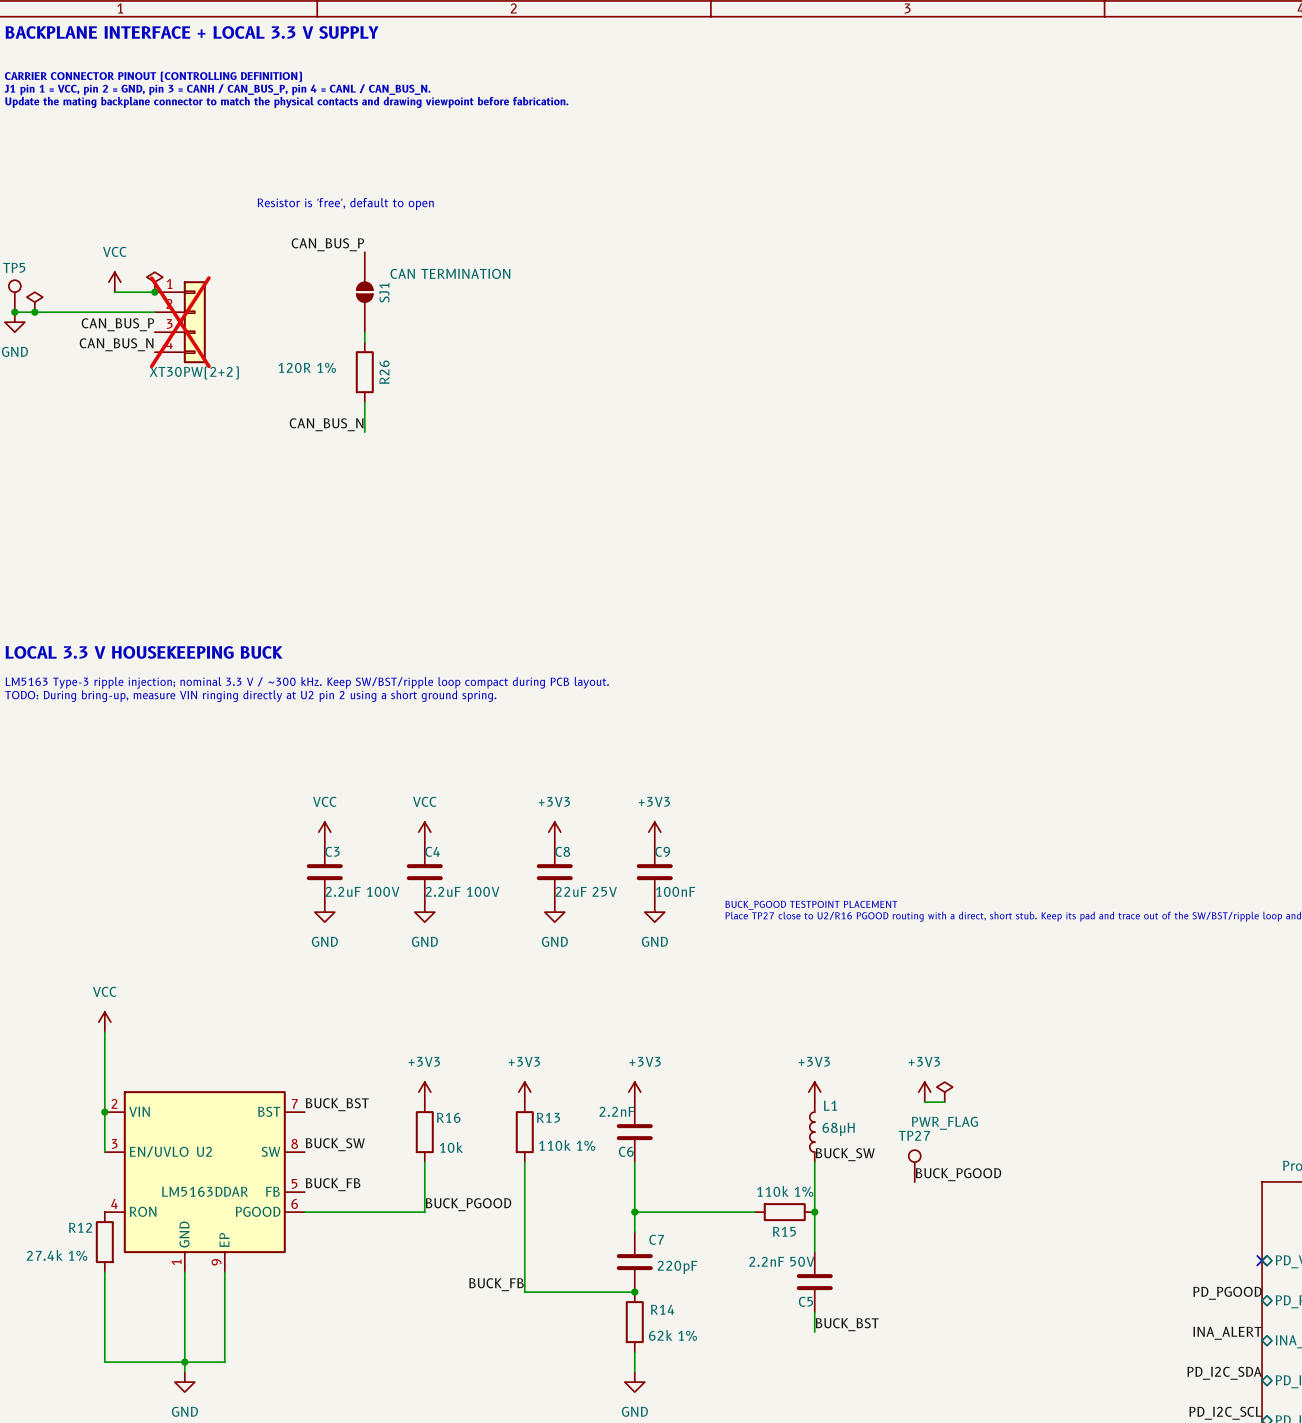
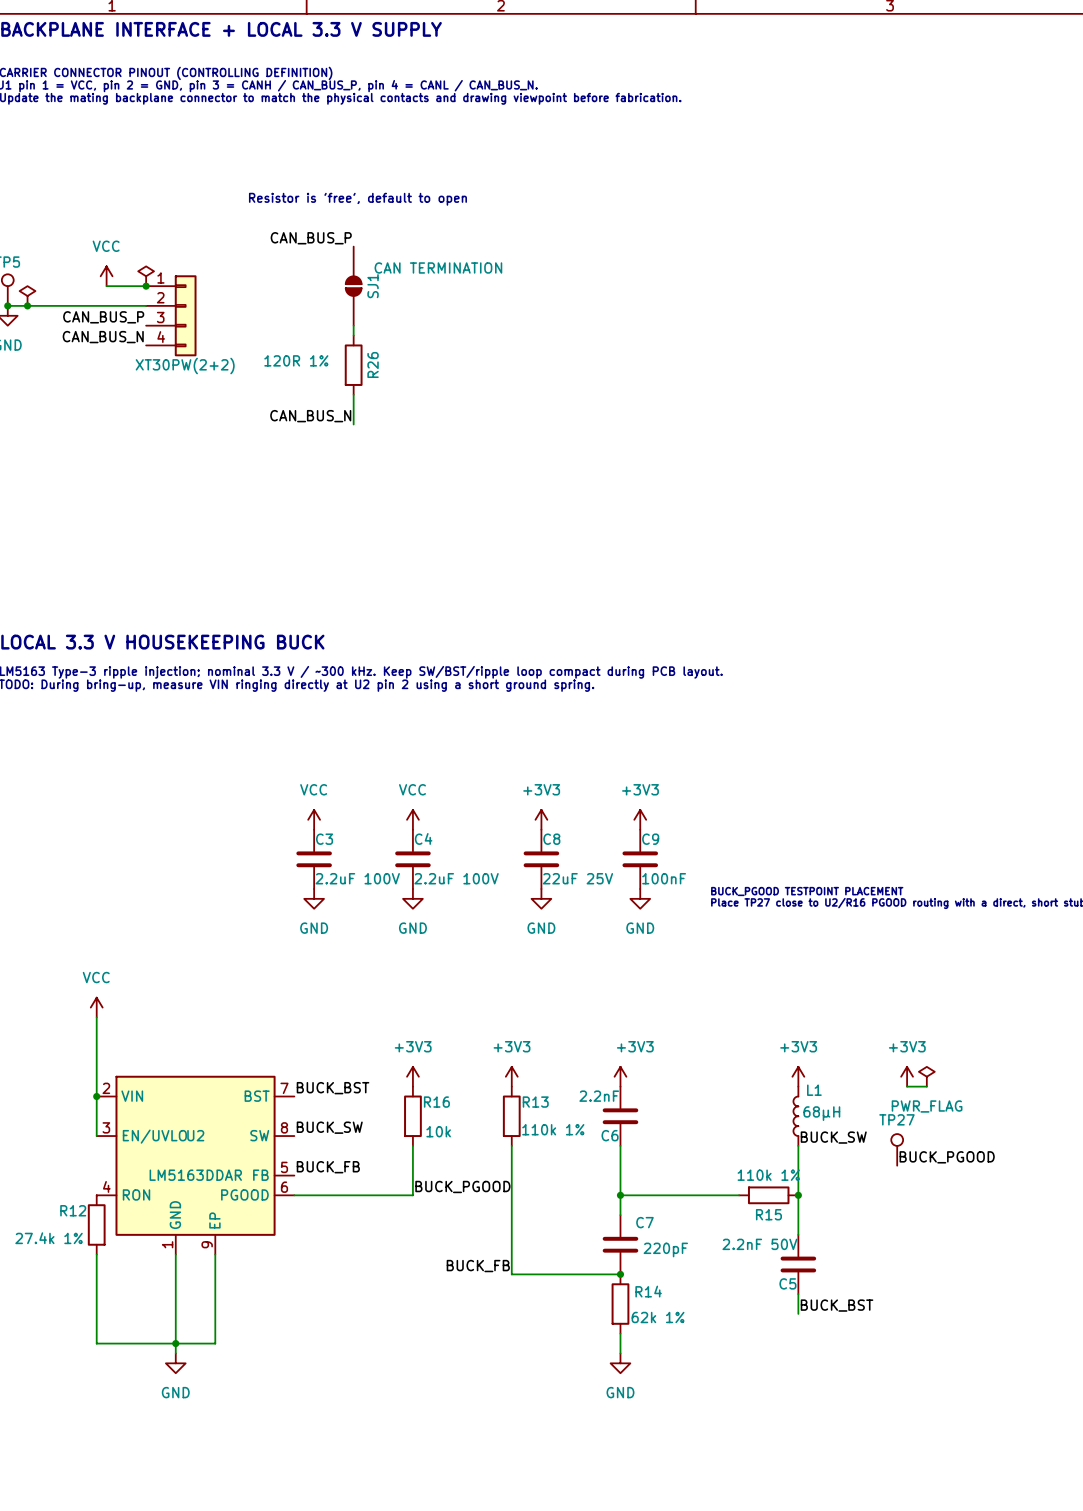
part do-not-place cross: (180, 322) -> none

